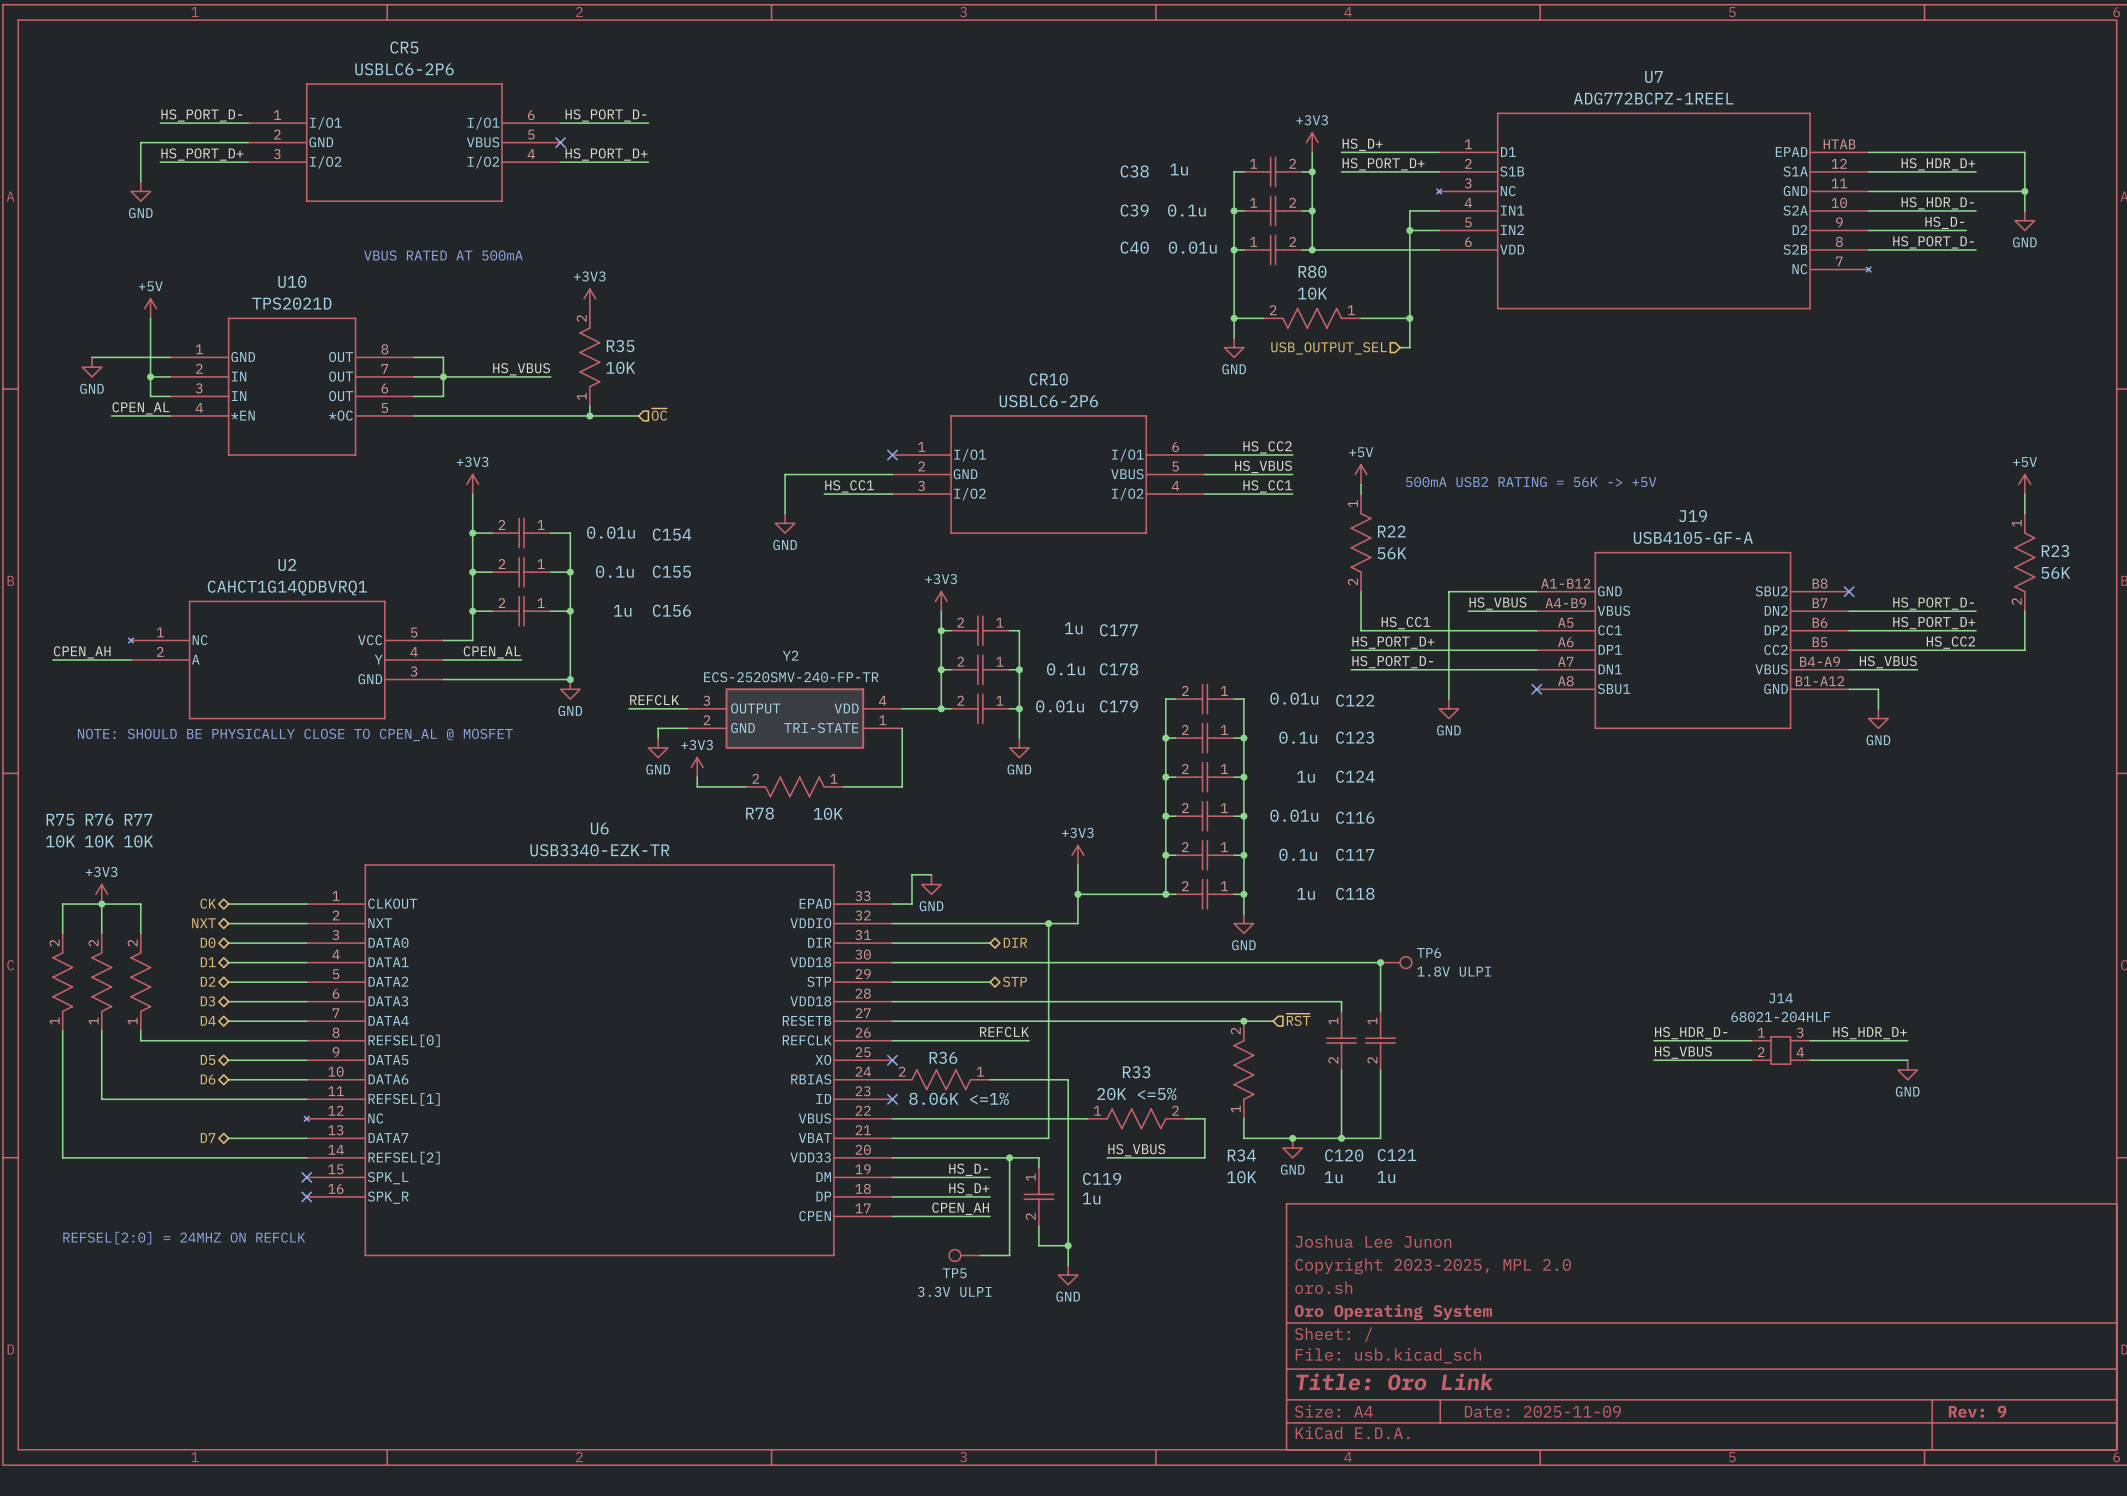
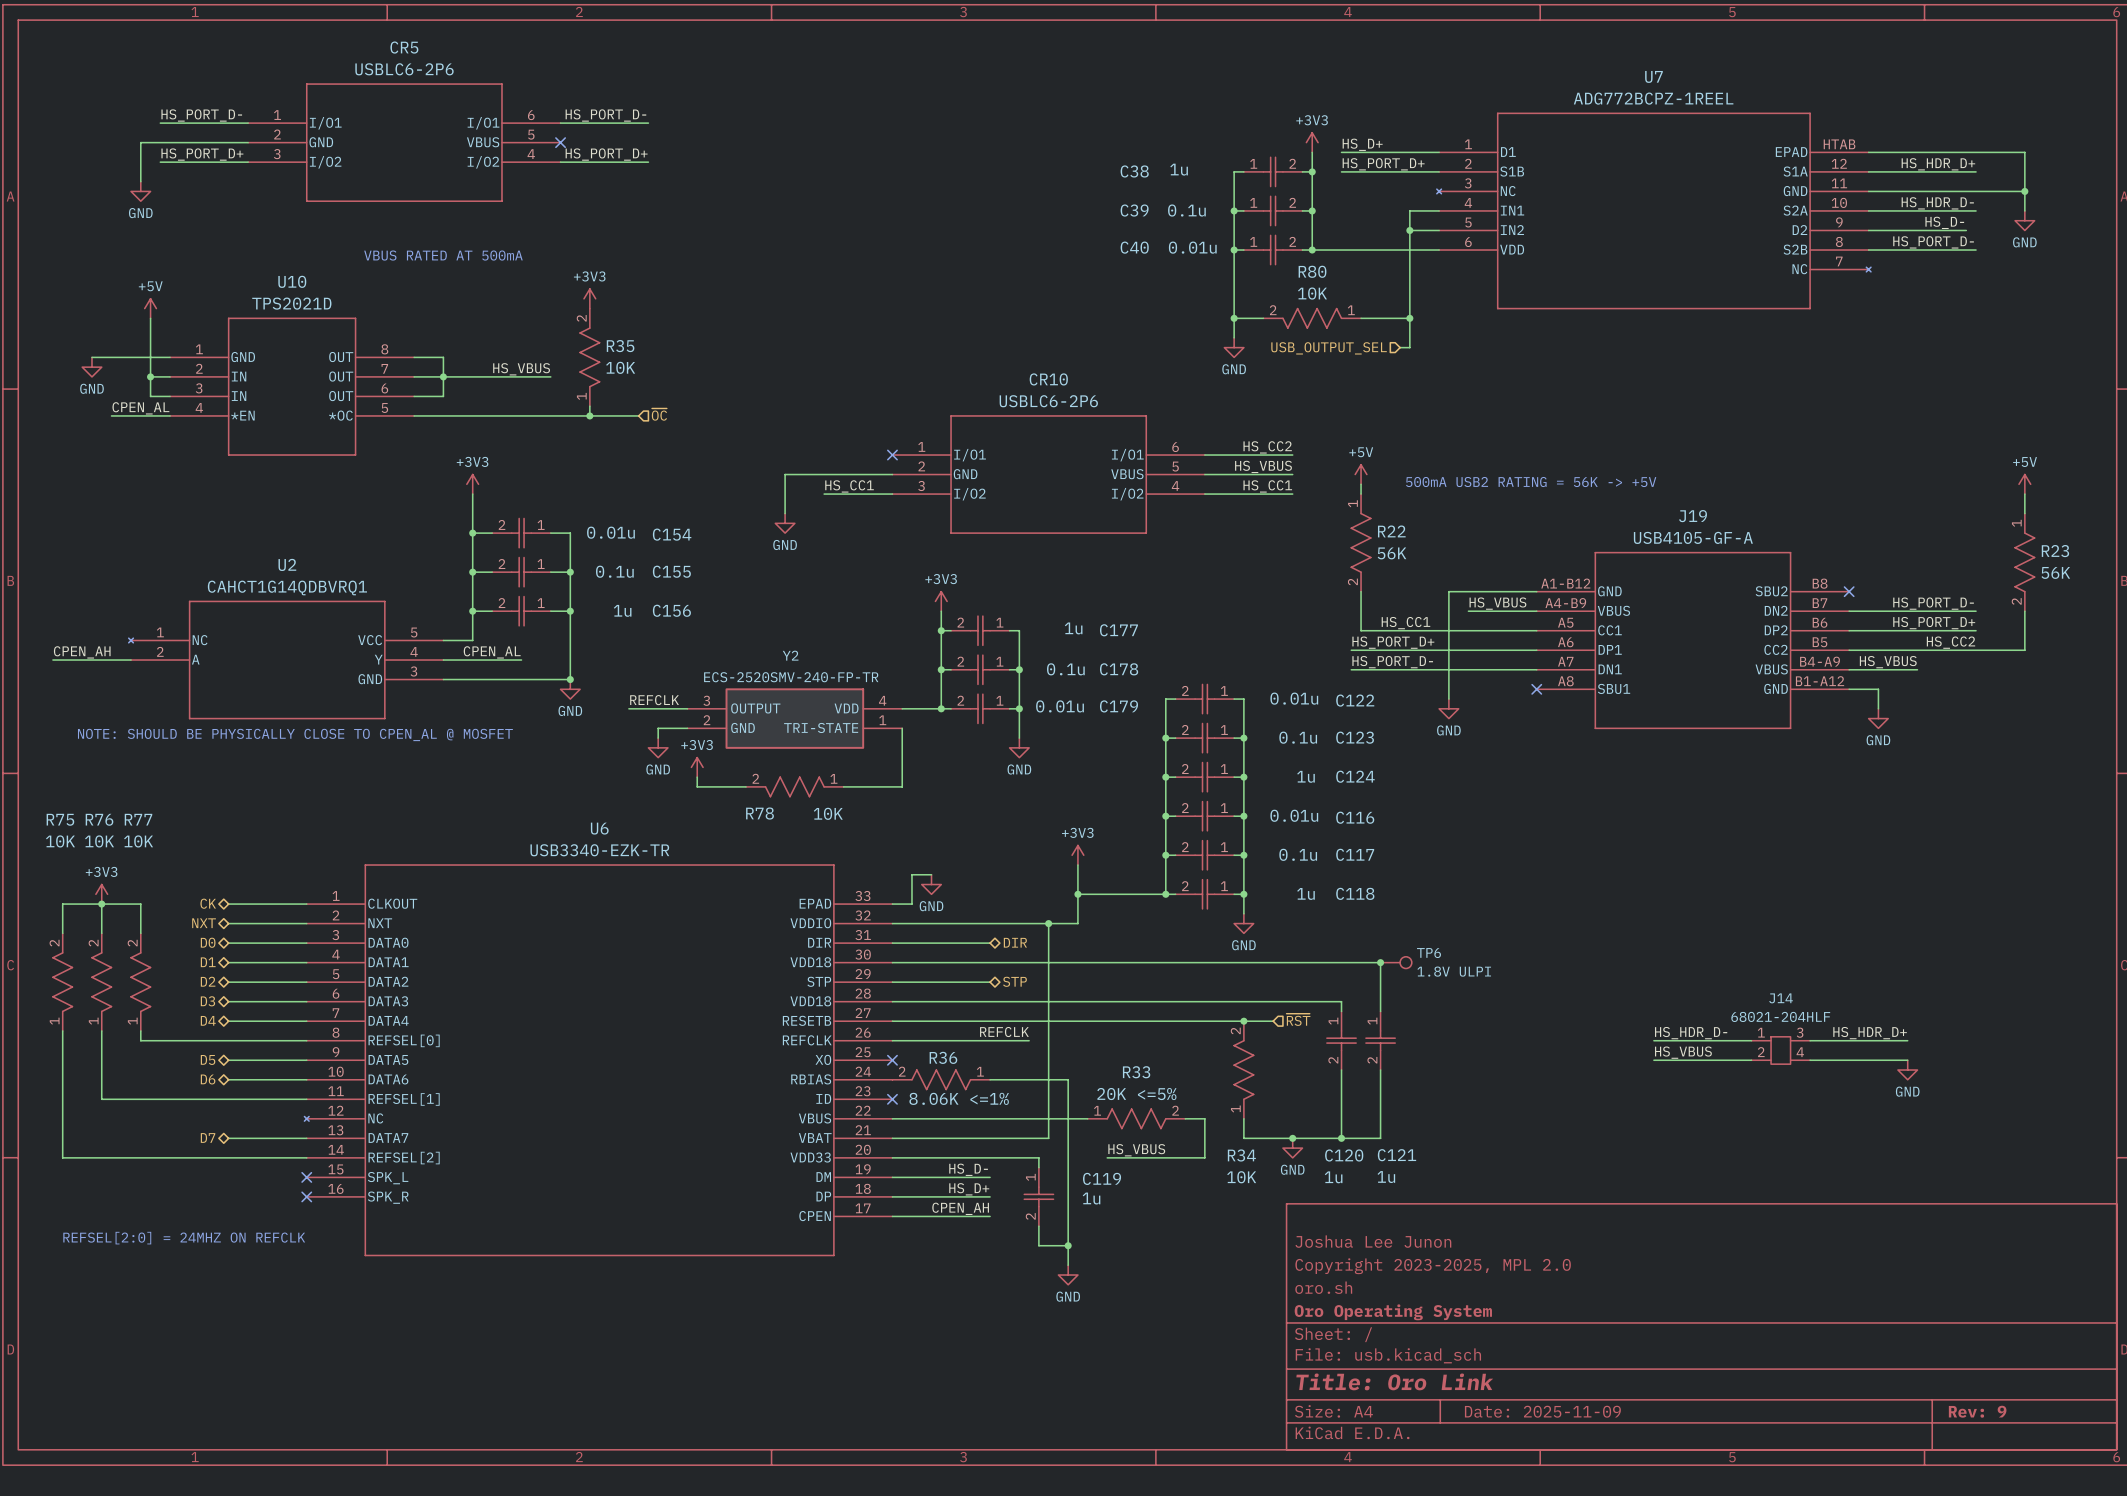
wire: (1009, 1157) (1009, 1255) (980, 1255) -> none
junction: (1009, 1157) -> none
TP5: 3.3V ULPI (964, 1255) -> none

